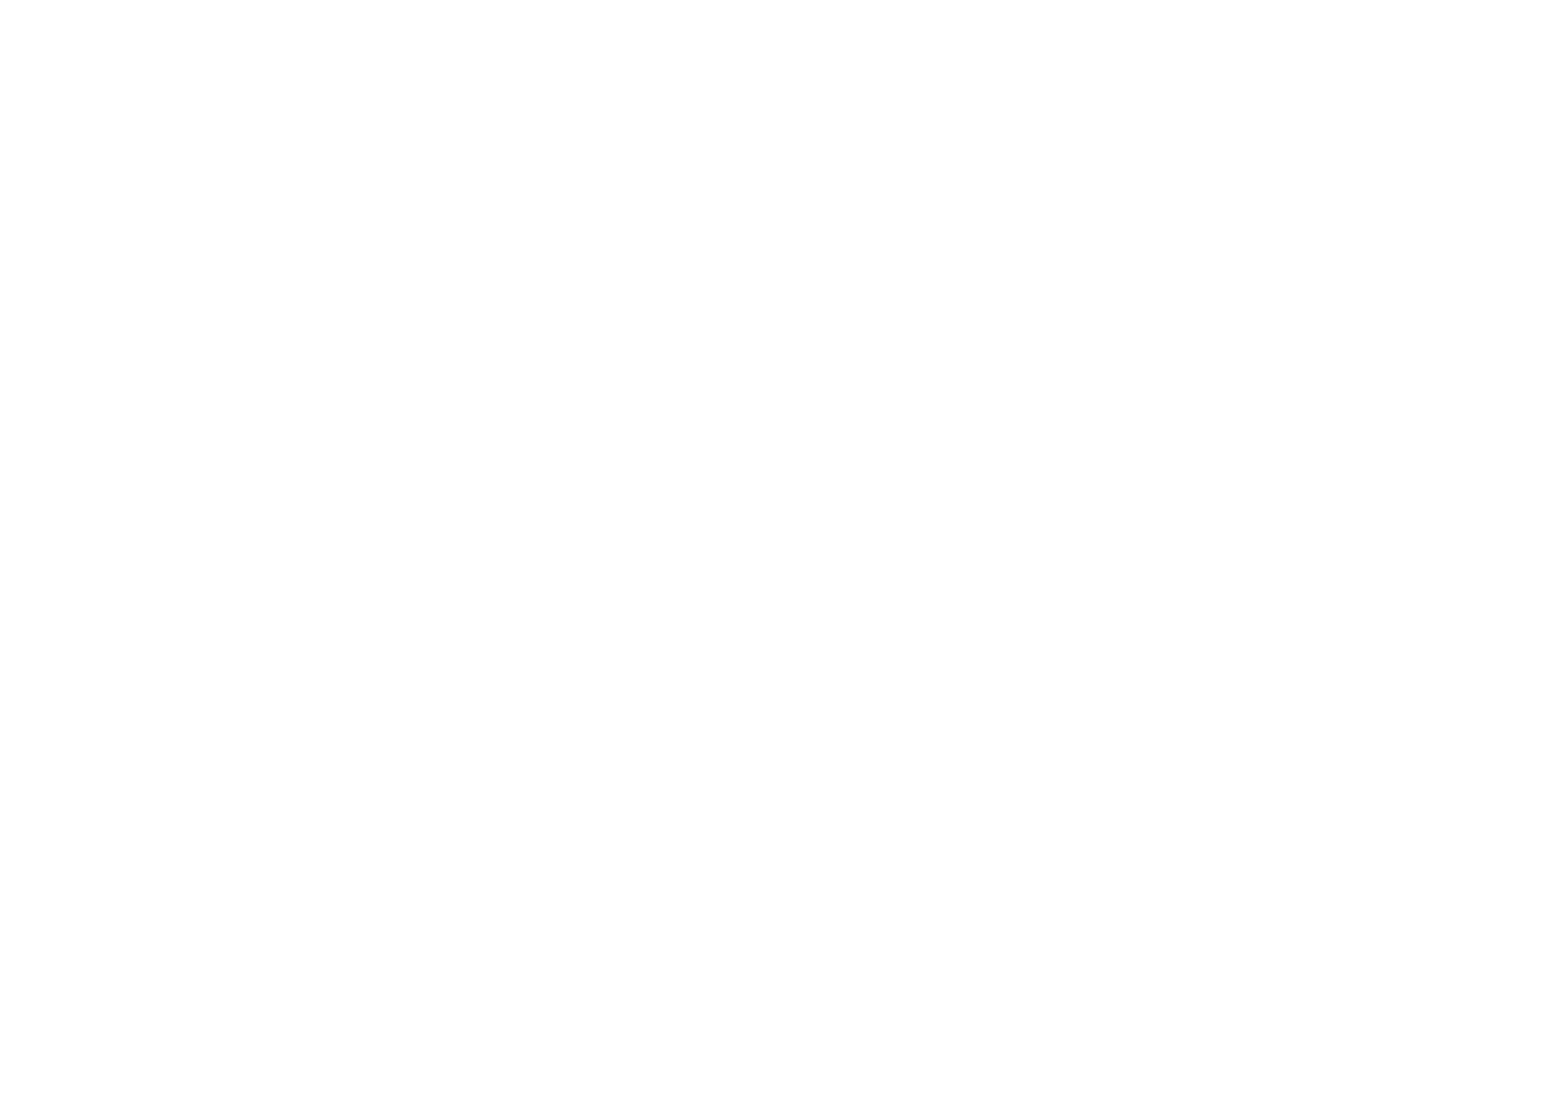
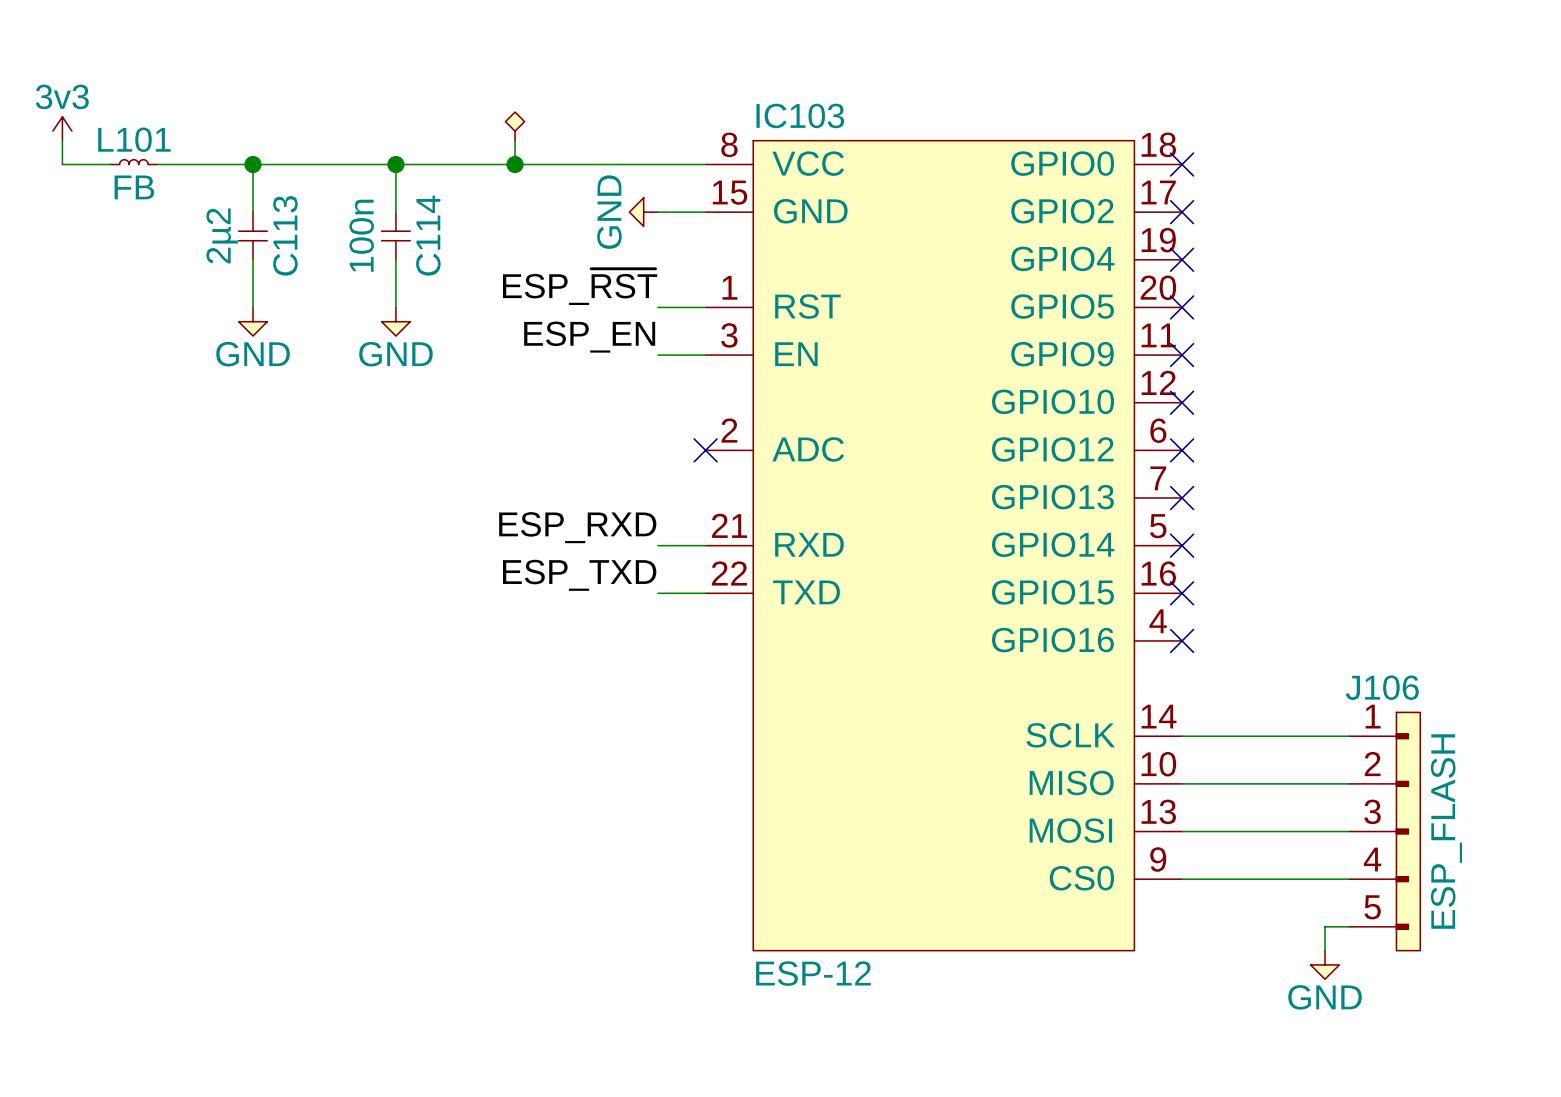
power symbol: none -> (515, 126)
power symbol: none -> 3v3 (62, 128)
wire: none -> (62, 140) (62, 164) (110, 164)
wire: none -> (515, 140) (515, 164)
L101: none -> FB (133, 162)
wire: none -> (157, 164) (705, 164)
wire: none -> (252, 164) (252, 212)
junction: none -> (252, 164)
wire: none -> (395, 164) (395, 212)
junction: none -> (395, 164)
junction: none -> (515, 164)
no-connect mark: none -> (1182, 164)
power symbol: none -> GND (643, 212)
wire: none -> (657, 212) (705, 212)
no-connect mark: none -> (1182, 212)
C113: none -> 2µ2 (252, 235)
C114: none -> 100n (395, 235)
wire: none -> (252, 259) (252, 307)
wire: none -> (395, 259) (395, 307)
no-connect mark: none -> (1182, 259)
label: none -> ESP_~{RST} (580, 286)
wire: none -> (657, 307) (705, 307)
no-connect mark: none -> (1182, 307)
power symbol: none -> GND (252, 321)
power symbol: none -> GND (395, 321)
label: none -> ESP_EN (589, 337)
wire: none -> (657, 355) (705, 355)
no-connect mark: none -> (1182, 355)
no-connect mark: none -> (1182, 402)
no-connect mark: none -> (705, 450)
no-connect mark: none -> (1182, 450)
no-connect mark: none -> (1182, 498)
label: none -> ESP_RXD (577, 527)
wire: none -> (657, 545) (705, 545)
IC103: none -> ESP-12 (943, 545)
no-connect mark: none -> (1182, 545)
label: none -> ESP_TXD (579, 575)
wire: none -> (657, 593) (705, 593)
no-connect mark: none -> (1182, 593)
no-connect mark: none -> (1182, 640)
wire: none -> (1182, 736) (1348, 736)
wire: none -> (1182, 783) (1348, 783)
wire: none -> (1182, 831) (1348, 831)
J106: none -> ESP_FLASH (1384, 831)
wire: none -> (1182, 879) (1348, 879)
wire: none -> (1348, 926) (1325, 926) (1325, 950)
power symbol: none -> GND (1325, 964)

